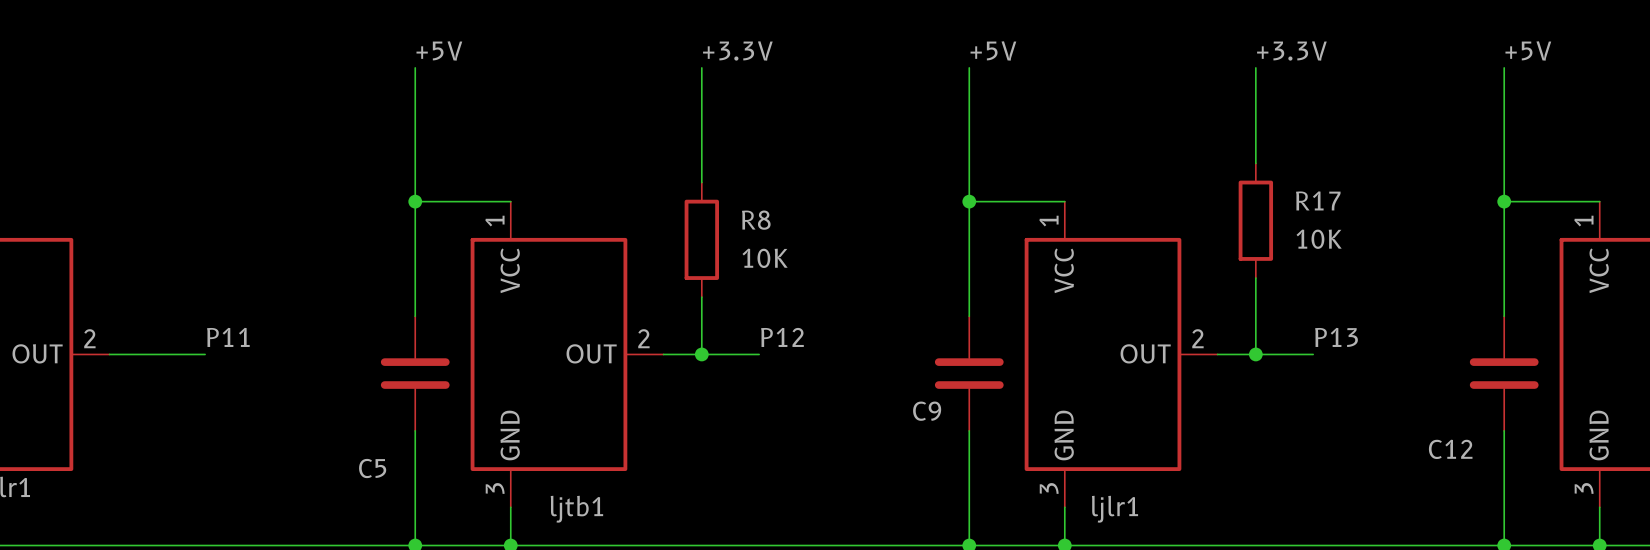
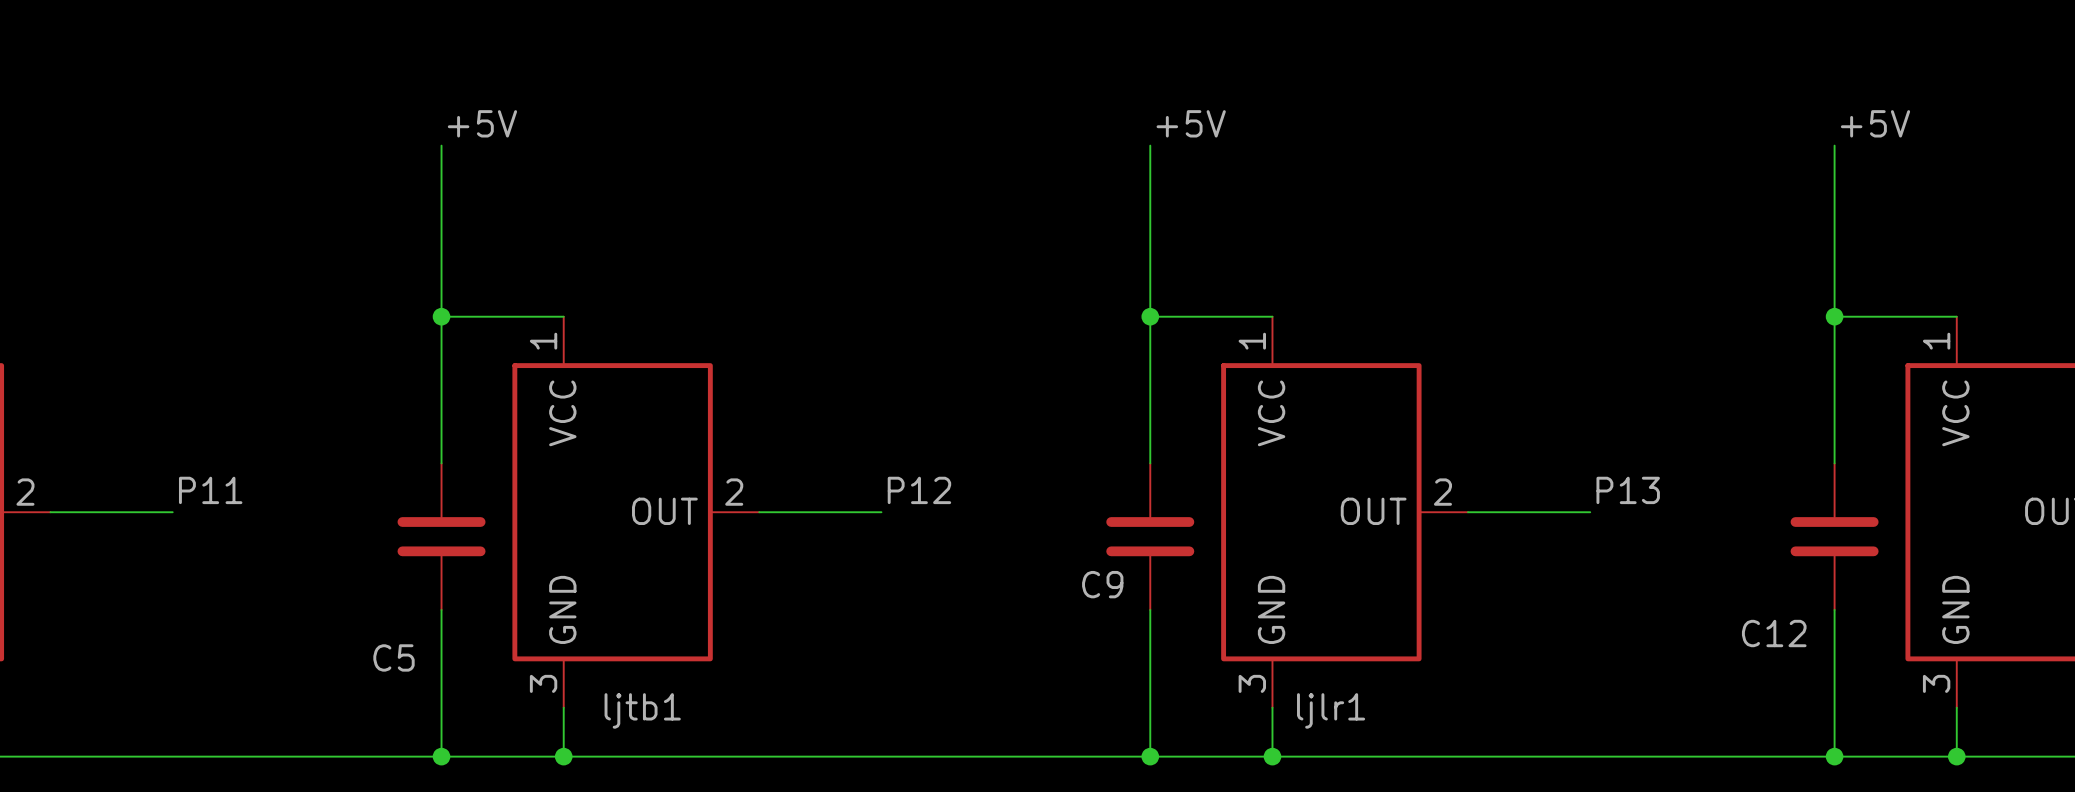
label: +3.3V (737, 50) -> none
label: +3.3V (1291, 50) -> none
wire: (701, 67) (701, 182) -> none
wire: (1255, 67) (1255, 163) -> none
R17: 10K (1255, 220) -> none
R8: 10K (701, 239) -> none
wire: (1255, 278) (1255, 354) -> none
wire: (701, 297) (701, 354) -> none
junction: (701, 354) -> none
junction: (1255, 354) -> none

